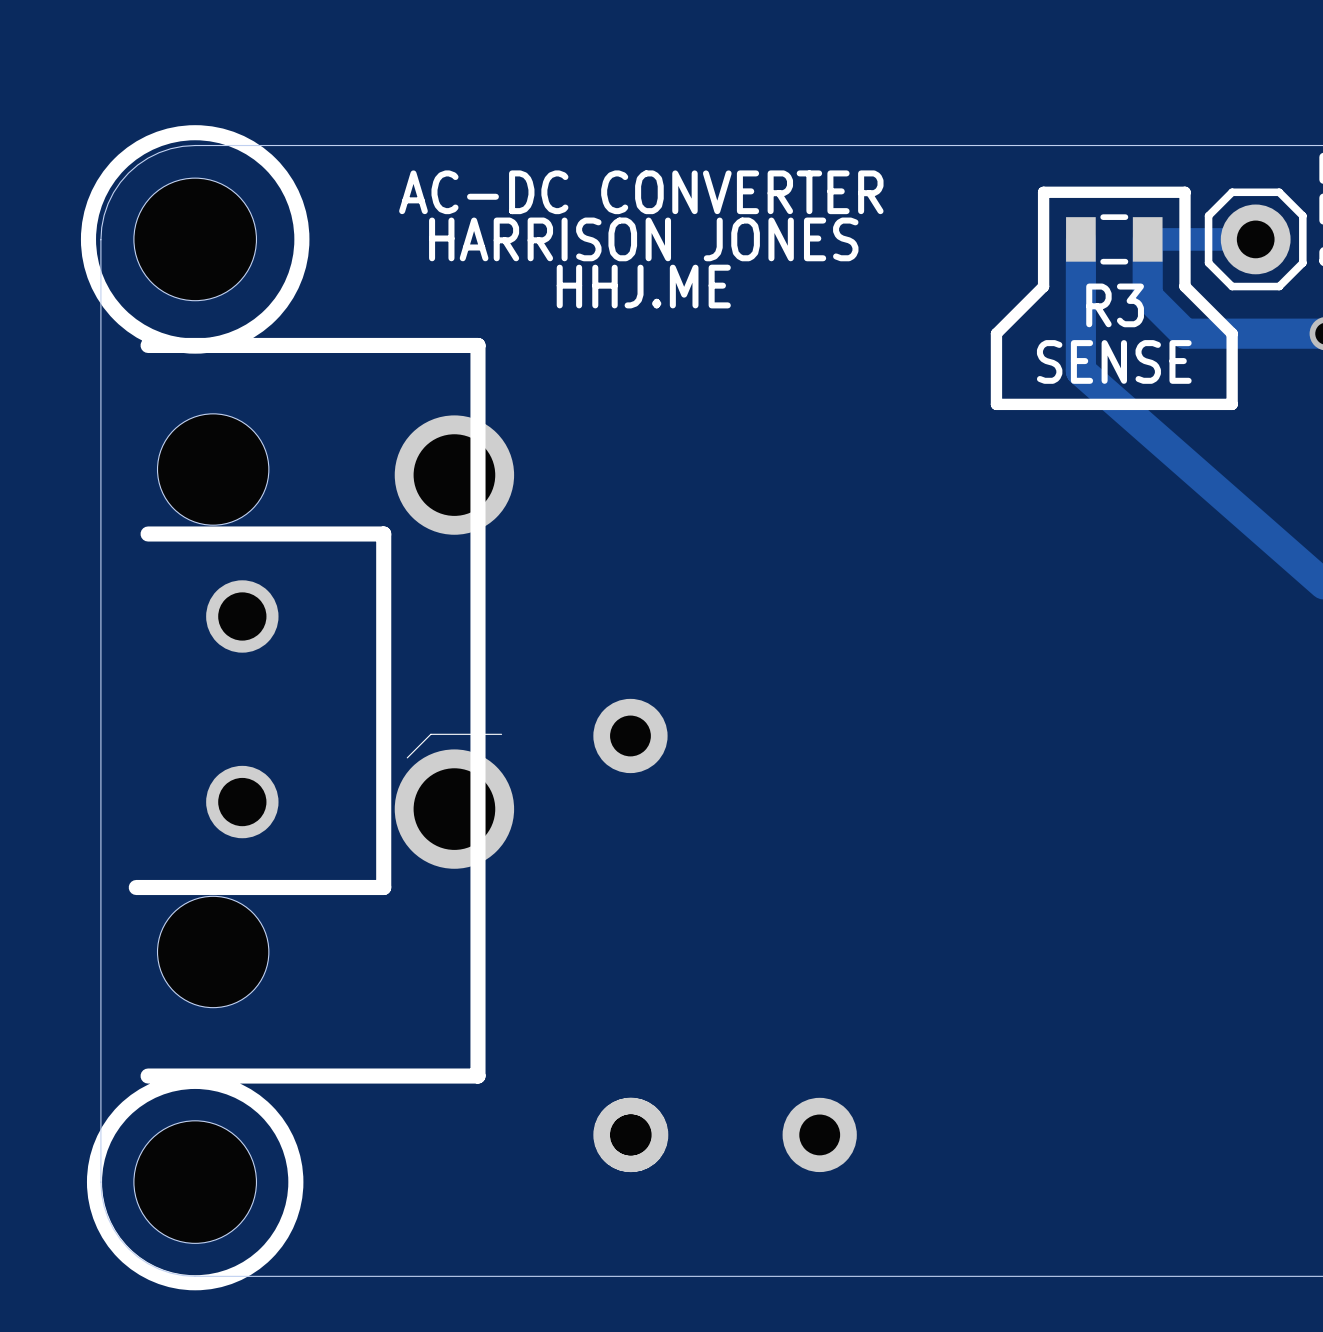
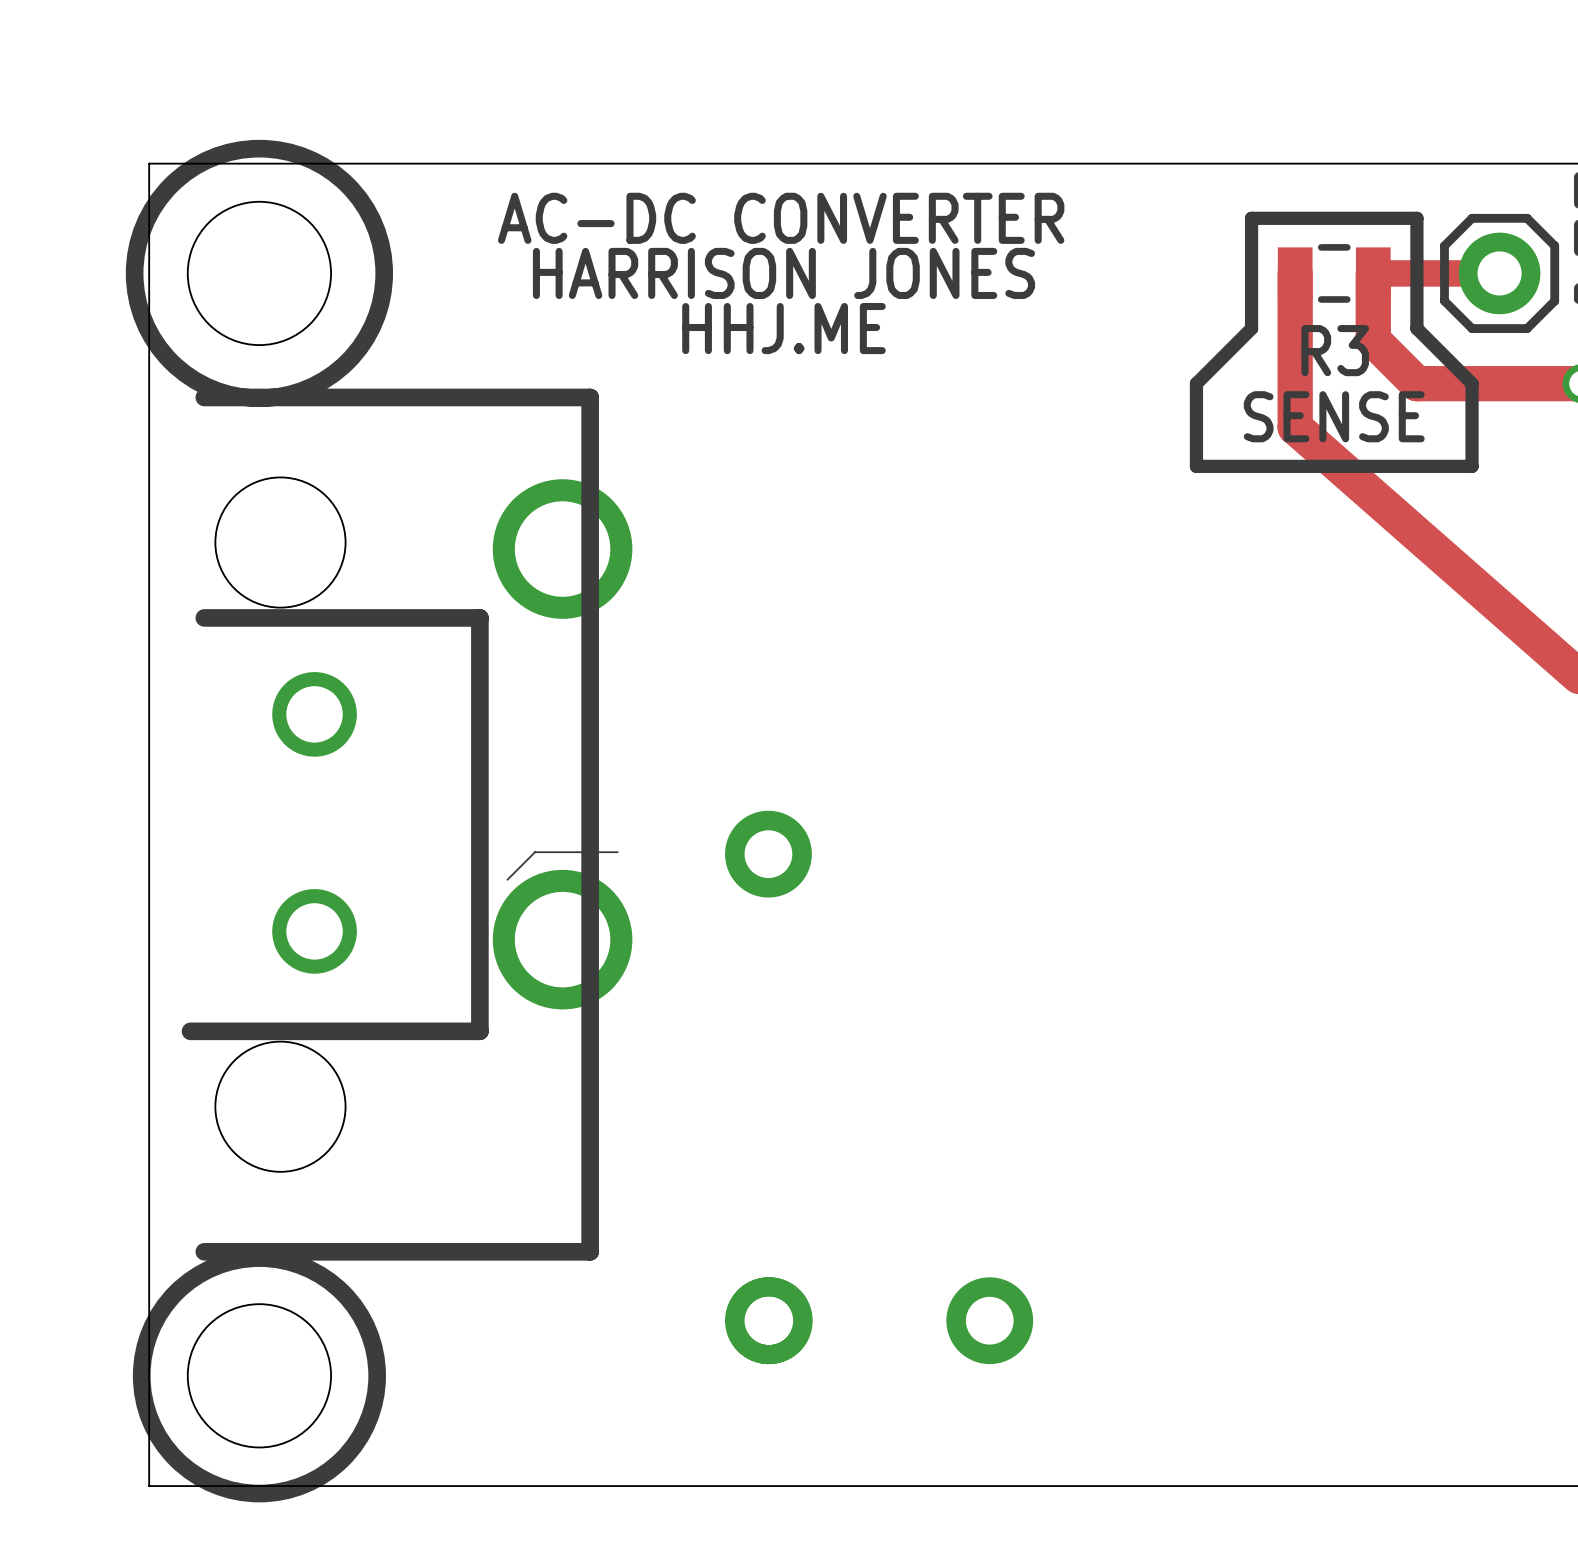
board edge: (195, 145) (170, 148) (159, 152) (137, 164) (128, 173) (120, 182) (108, 203) (104, 215) (100, 239) -> (259, 163) (149, 163) (149, 273)
board edge: (100, 1182) (104, 1206) (108, 1218) (120, 1239) (128, 1248) (137, 1256) (159, 1269) (170, 1273) (195, 1276) -> (149, 1375) (149, 1486) (259, 1486)

